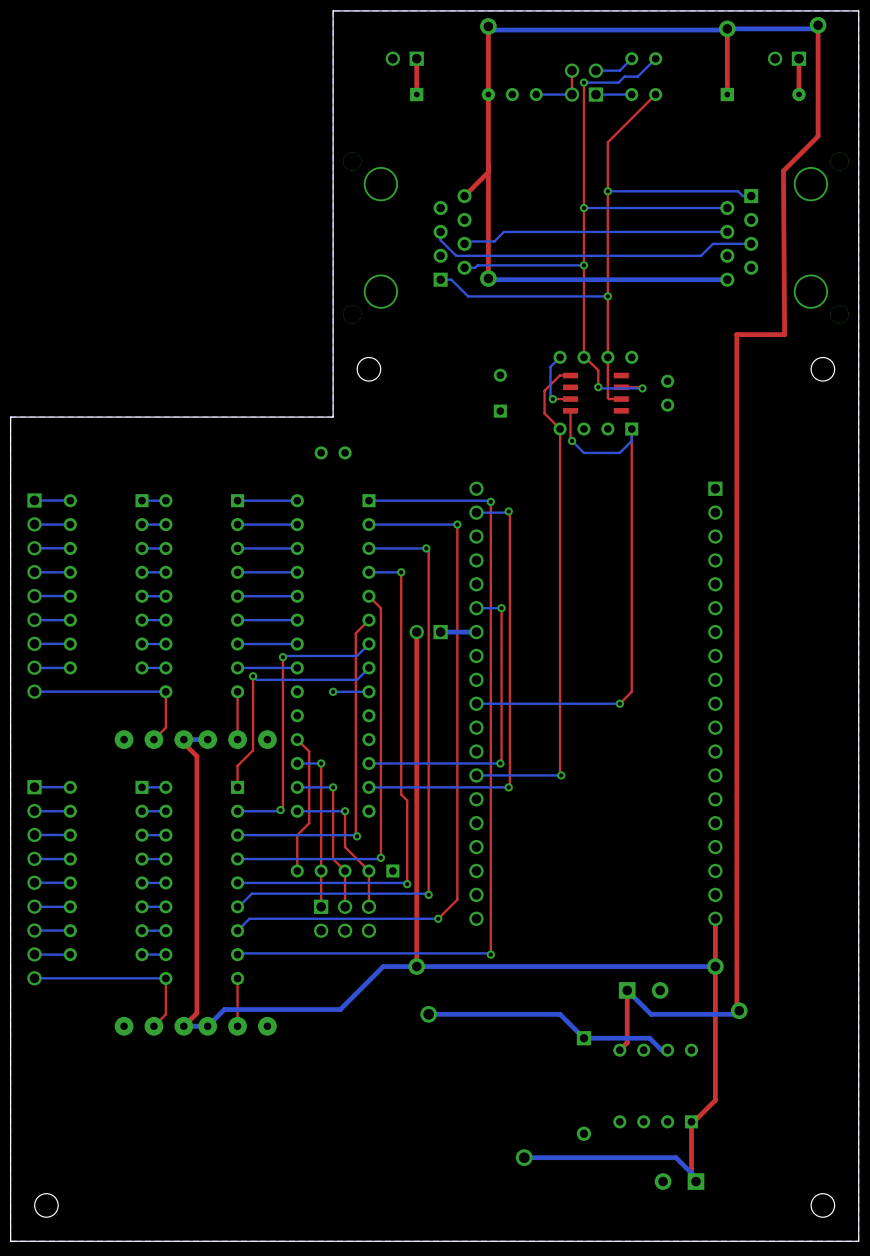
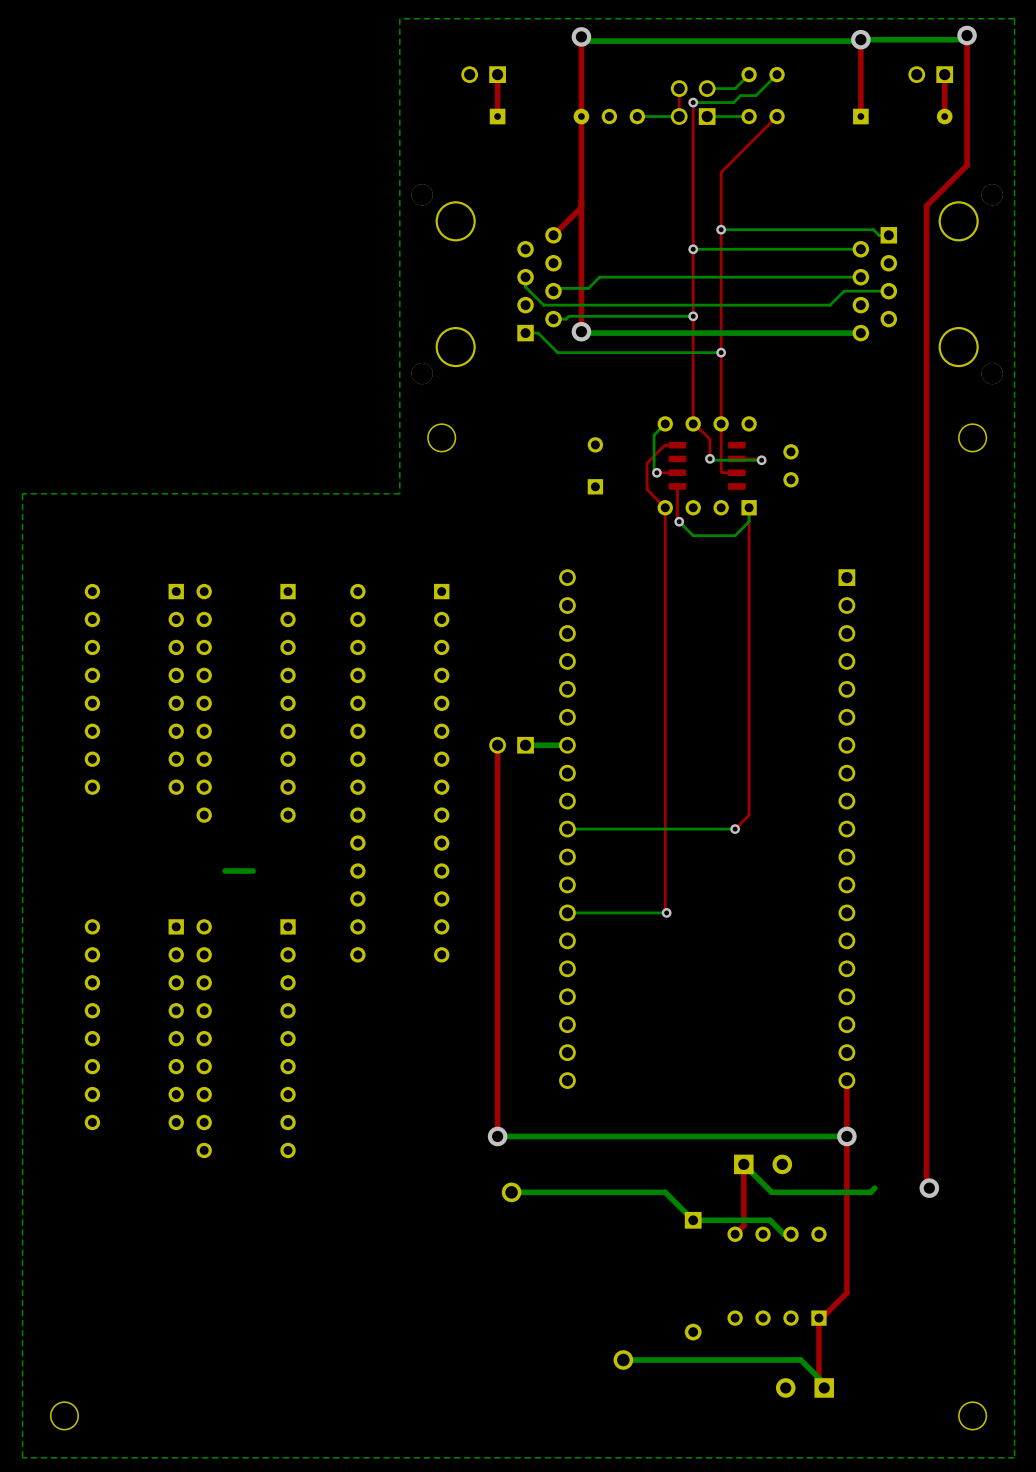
board edge: (858, 10) (858, 1241) (10, 1241) (10, 417) (333, 417) (333, 10) (858, 10) -> none
top track: (783, 171) (784, 334) (736, 334) (736, 1008) (739, 1010) -> (926, 205) (926, 1185) (929, 1188)
part: (333, 452) -> none
bottom track: (34, 500) (70, 500) -> none
bottom track: (165, 500) (142, 500) -> none
bottom track: (297, 500) (237, 500) -> none
bottom track: (368, 500) (490, 501) -> none
top track: (490, 501) (490, 954) -> none
via: (490, 501) -> none
top track: (508, 511) (508, 787) -> none
bottom track: (508, 511) (476, 512) -> none
via: (508, 511) -> none
bottom track: (34, 524) (70, 524) -> none
bottom track: (165, 524) (142, 524) -> none
bottom track: (297, 524) (237, 524) -> none
top track: (457, 524) (457, 899) (438, 918) -> none
bottom track: (457, 524) (368, 524) -> none
via: (457, 524) -> none
bottom track: (34, 548) (70, 548) -> none
bottom track: (165, 548) (142, 548) -> none
bottom track: (297, 548) (237, 548) -> none
top track: (426, 548) (428, 550) (428, 894) -> none
bottom track: (426, 548) (368, 548) -> none
via: (426, 548) -> none
bottom track: (34, 572) (70, 572) -> none
bottom track: (165, 572) (142, 572) -> none
bottom track: (297, 572) (237, 572) -> none
top track: (401, 572) (401, 794) (407, 800) (407, 884) -> none
bottom track: (401, 572) (368, 572) -> none
via: (401, 572) -> none
bottom track: (34, 596) (70, 596) -> none
part: (34, 596) -> none
bottom track: (165, 596) (142, 596) -> none
bottom track: (297, 596) (237, 596) -> none
top track: (368, 596) (380, 608) (380, 857) -> none
top track: (501, 608) (500, 763) -> none
bottom track: (501, 608) (476, 608) -> none
via: (501, 608) -> none
bottom track: (34, 619) (70, 620) -> none
bottom track: (165, 620) (142, 620) -> none
bottom track: (297, 620) (237, 620) -> none
top track: (368, 620) (355, 633) (357, 836) -> none
bottom track: (34, 643) (70, 644) -> none
bottom track: (165, 644) (142, 644) -> none
bottom track: (297, 644) (237, 644) -> none
bottom track: (368, 644) (357, 655) (282, 657) -> none
top track: (282, 657) (282, 807) (280, 810) -> none
via: (282, 657) -> none
bottom track: (34, 667) (70, 667) -> none
bottom track: (165, 667) (142, 667) -> none
bottom track: (297, 667) (237, 667) -> none
bottom track: (368, 667) (357, 679) (256, 679) (253, 676) -> none
top track: (253, 676) (253, 750) (237, 765) (237, 787) -> none
via: (253, 676) -> none
bottom track: (34, 691) (165, 691) -> none
top track: (165, 691) (165, 727) (153, 739) -> none
top track: (237, 691) (237, 739) -> none
via: (333, 691) -> none
bottom track: (368, 691) (333, 691) -> none
part: (153, 739) -> none
top track: (183, 739) (183, 743) (196, 756) (196, 1013) (183, 1026) -> none
part: (237, 739) -> none
top track: (297, 739) (309, 751) (309, 823) (297, 835) (297, 870) -> none
top track: (321, 763) (321, 906) -> none
bottom track: (321, 763) (297, 763) -> none
via: (321, 763) -> none
bottom track: (500, 763) (368, 763) -> none
via: (500, 763) -> none
bottom track: (34, 787) (70, 787) -> none
bottom track: (165, 787) (142, 787) -> none
top track: (333, 787) (333, 859) (345, 870) (345, 906) -> none
bottom track: (333, 787) (297, 787) -> none
via: (333, 787) -> none
bottom track: (508, 787) (368, 787) -> none
via: (508, 787) -> none
bottom track: (280, 810) (237, 811) -> none
via: (280, 810) -> none
bottom track: (34, 811) (70, 811) -> none
bottom track: (165, 811) (142, 811) -> none
top track: (345, 811) (345, 847) (368, 870) (368, 906) -> none
bottom track: (345, 811) (297, 811) -> none
via: (345, 811) -> none
bottom track: (34, 834) (70, 835) -> none
bottom track: (165, 835) (142, 835) -> none
bottom track: (237, 835) (357, 836) -> none
via: (357, 836) -> none
bottom track: (380, 857) (237, 859) -> none
via: (380, 857) -> none
bottom track: (34, 858) (70, 859) -> none
bottom track: (165, 859) (142, 859) -> none
part: (345, 870) -> none
bottom track: (34, 882) (70, 882) -> none
part: (34, 882) -> none
bottom track: (165, 882) (142, 882) -> none
bottom track: (237, 882) (407, 884) -> none
via: (407, 884) -> none
bottom track: (428, 894) (251, 893) (237, 906) -> none
via: (428, 894) -> none
bottom track: (34, 906) (70, 906) -> none
bottom track: (165, 906) (142, 906) -> none
part: (345, 918) -> none
bottom track: (438, 918) (249, 918) (237, 930) -> none
via: (438, 918) -> none
bottom track: (34, 930) (70, 930) -> none
bottom track: (165, 930) (142, 930) -> none
bottom track: (34, 954) (70, 954) -> none
bottom track: (165, 954) (142, 954) -> none
bottom track: (490, 954) (237, 954) -> none
via: (490, 954) -> none
bottom track: (416, 966) (383, 966) (340, 1009) (224, 1009) (207, 1026) (183, 1026) -> none
bottom track: (34, 978) (165, 978) -> none
top track: (165, 978) (165, 1014) (153, 1026) -> none
top track: (237, 978) (237, 1026) -> none
via position: (739, 1010) -> (929, 1188)
part: (153, 1026) -> none
part: (237, 1026) -> none

